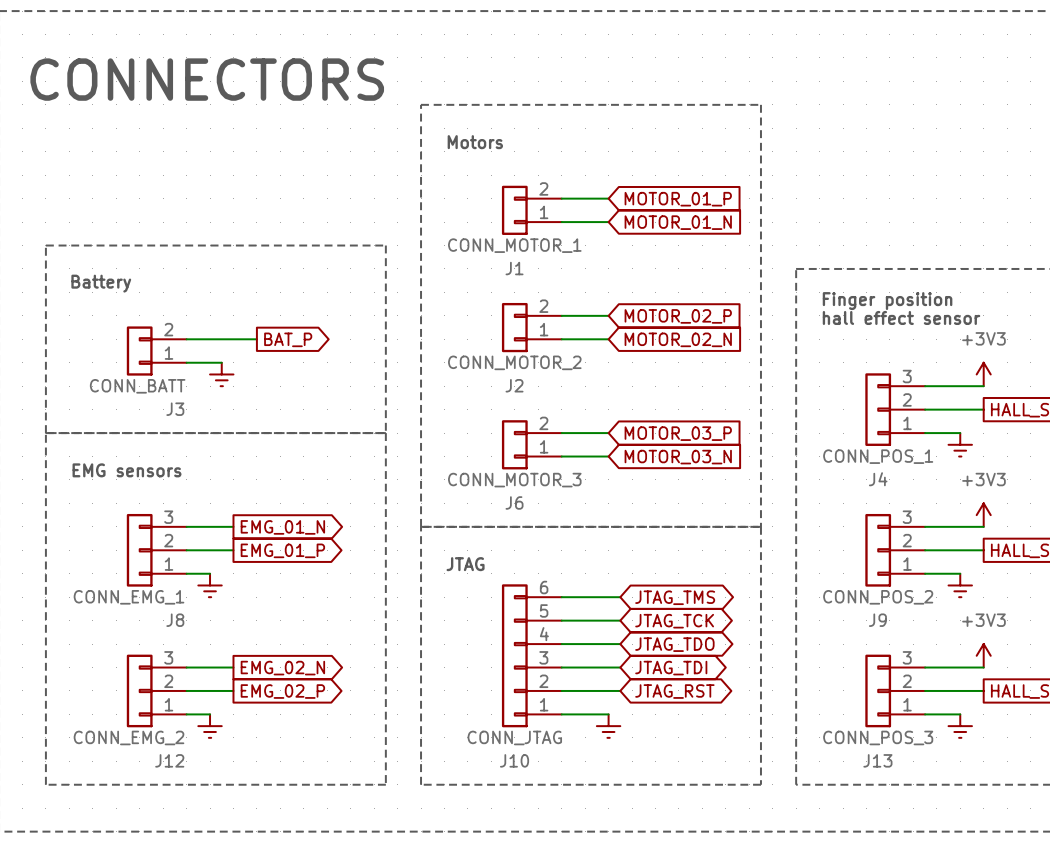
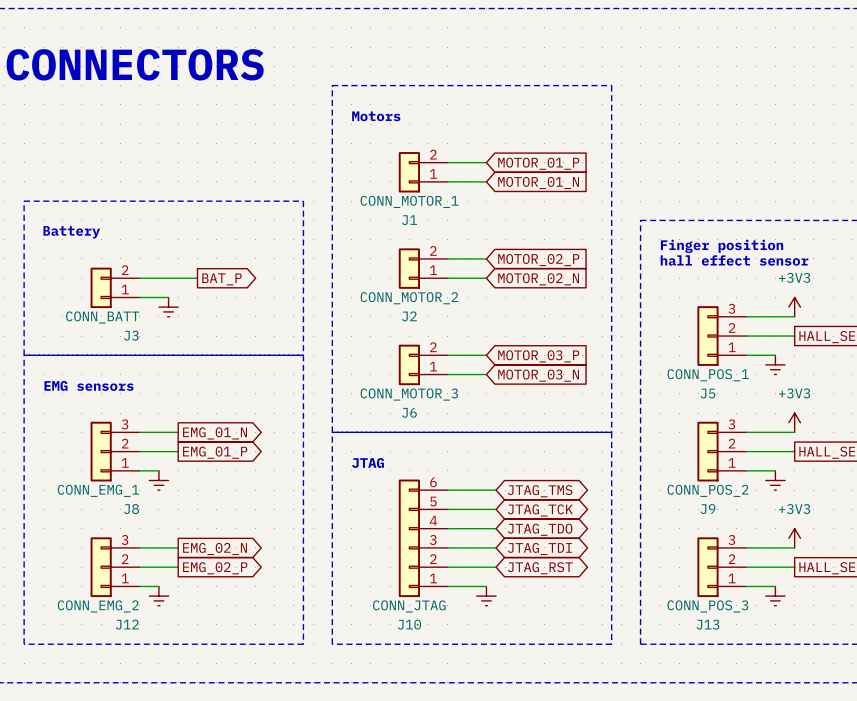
J4 name: J4 (878, 479) -> J5 (708, 393)

